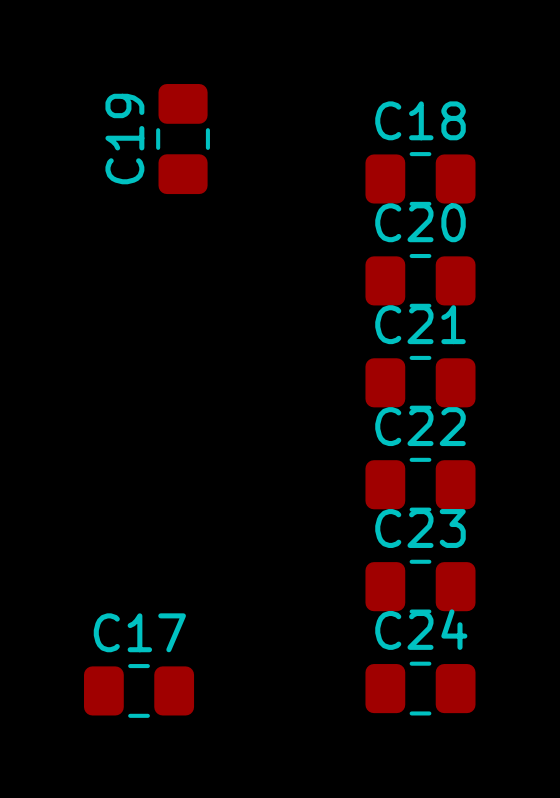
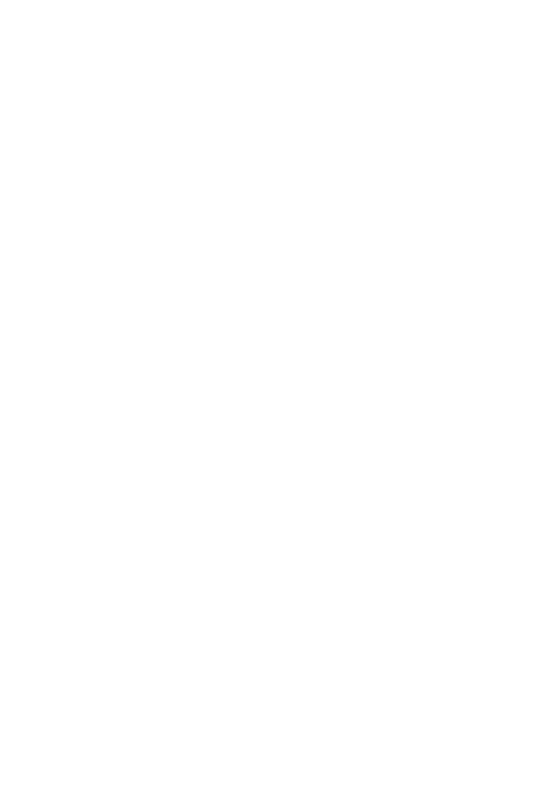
C19: (183, 139) -> none
C18: (420, 178) -> none
C20: (420, 280) -> none
C21: (420, 382) -> none
C22: (420, 484) -> none
C23: (420, 586) -> none
C24: (420, 688) -> none
C17: (139, 690) -> none

